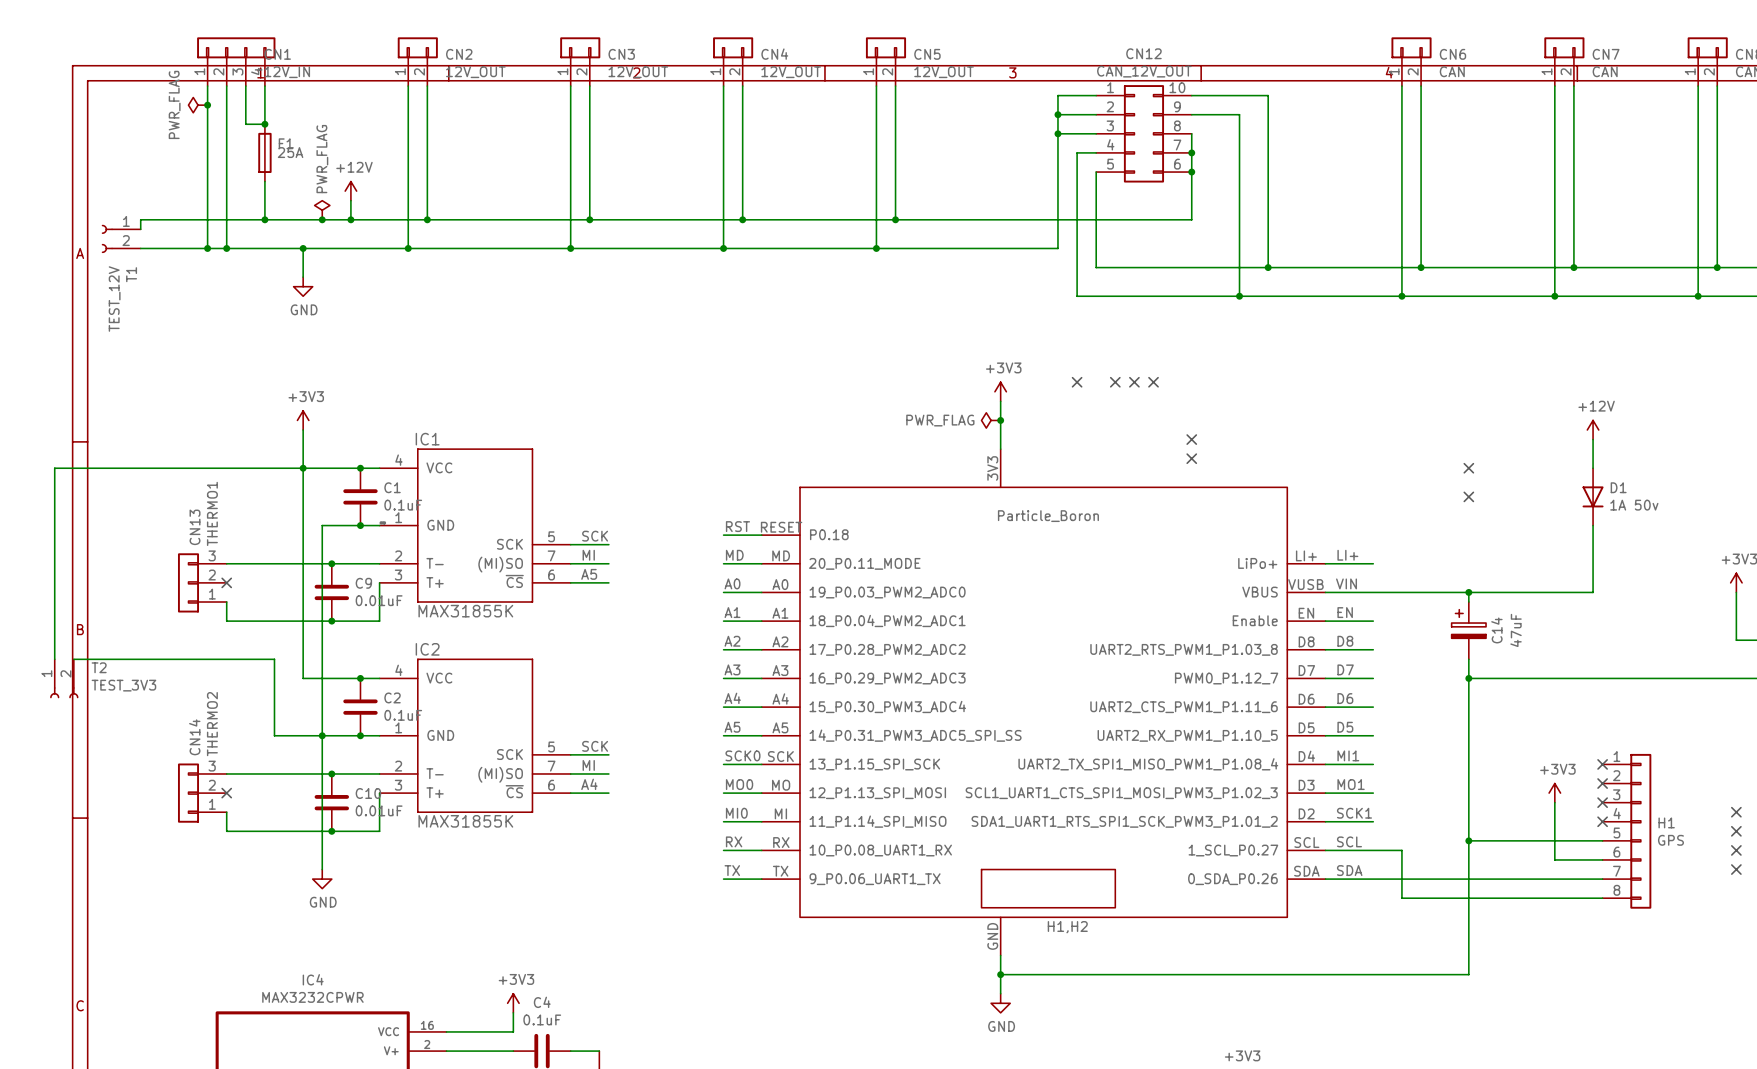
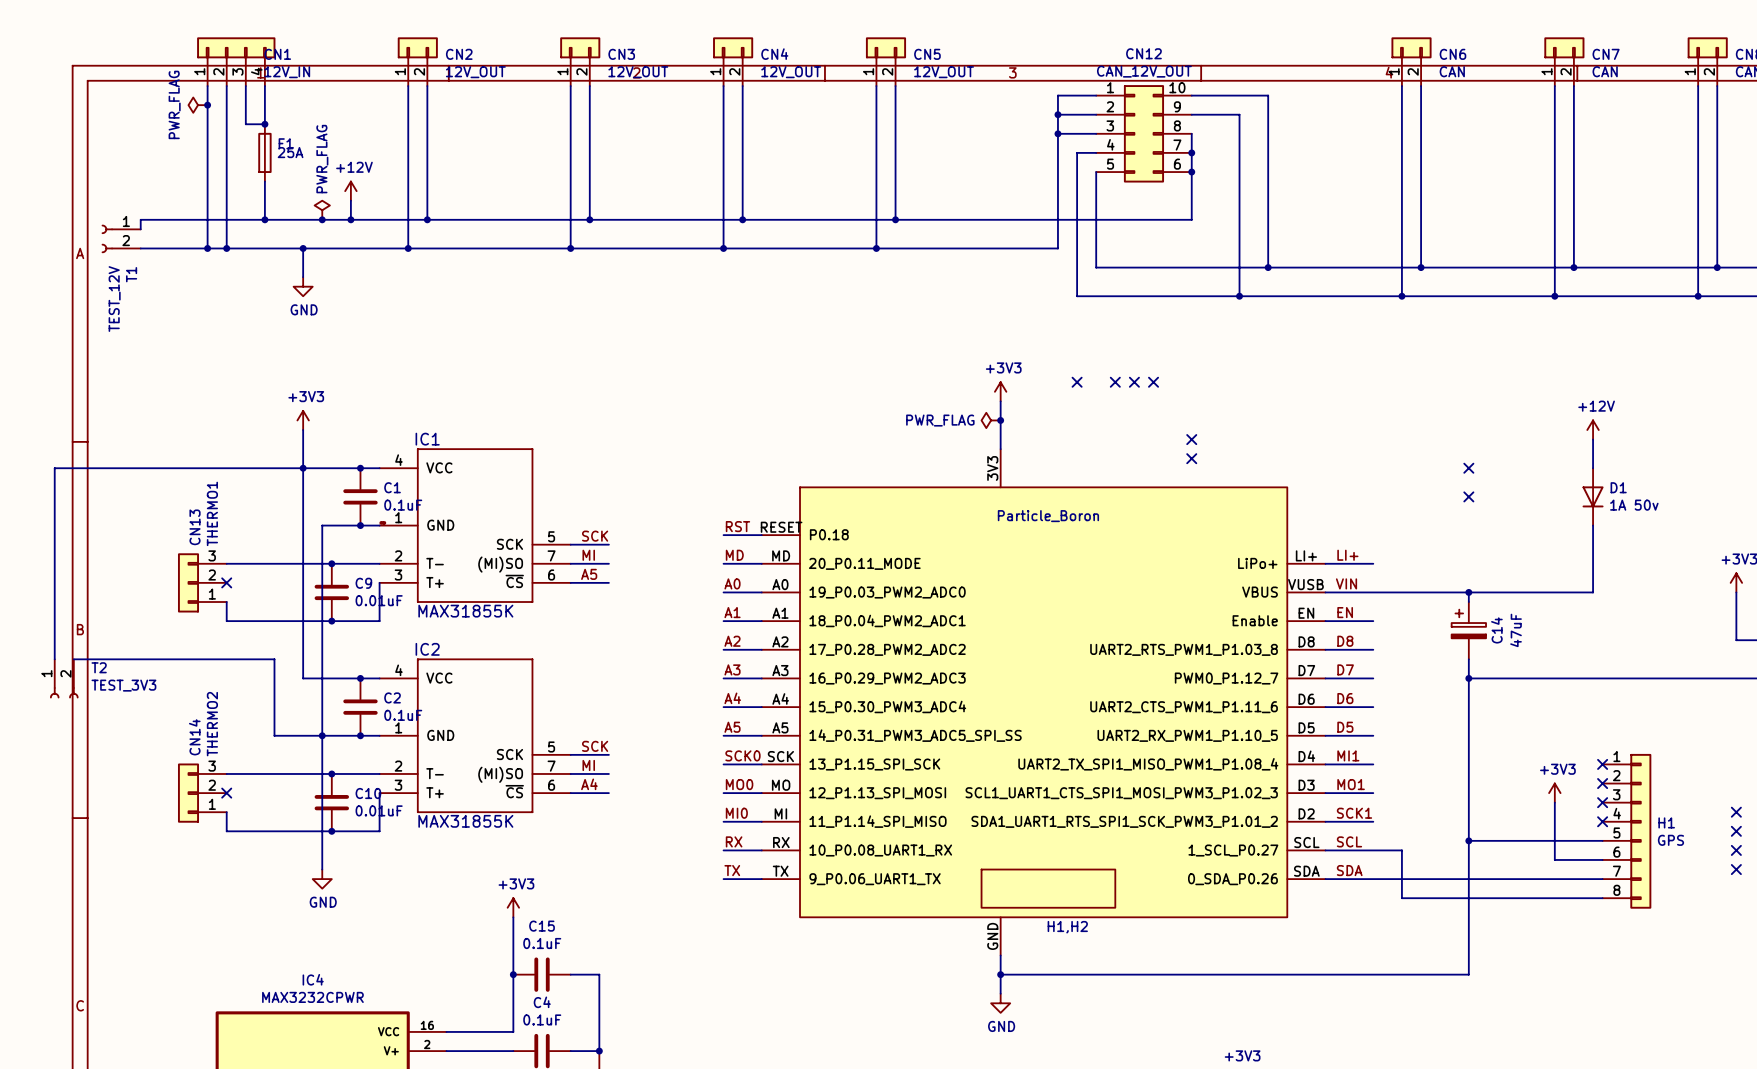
wire: none -> (513, 917) (513, 1012)
junction: none -> (513, 974)
C15: none -> 0.1uF (542, 974)
wire: none -> (570, 974) (599, 974) (599, 1051)
power symbol position: +3V3 (513, 1003) -> +3V3 (513, 907)
junction: none -> (599, 1051)

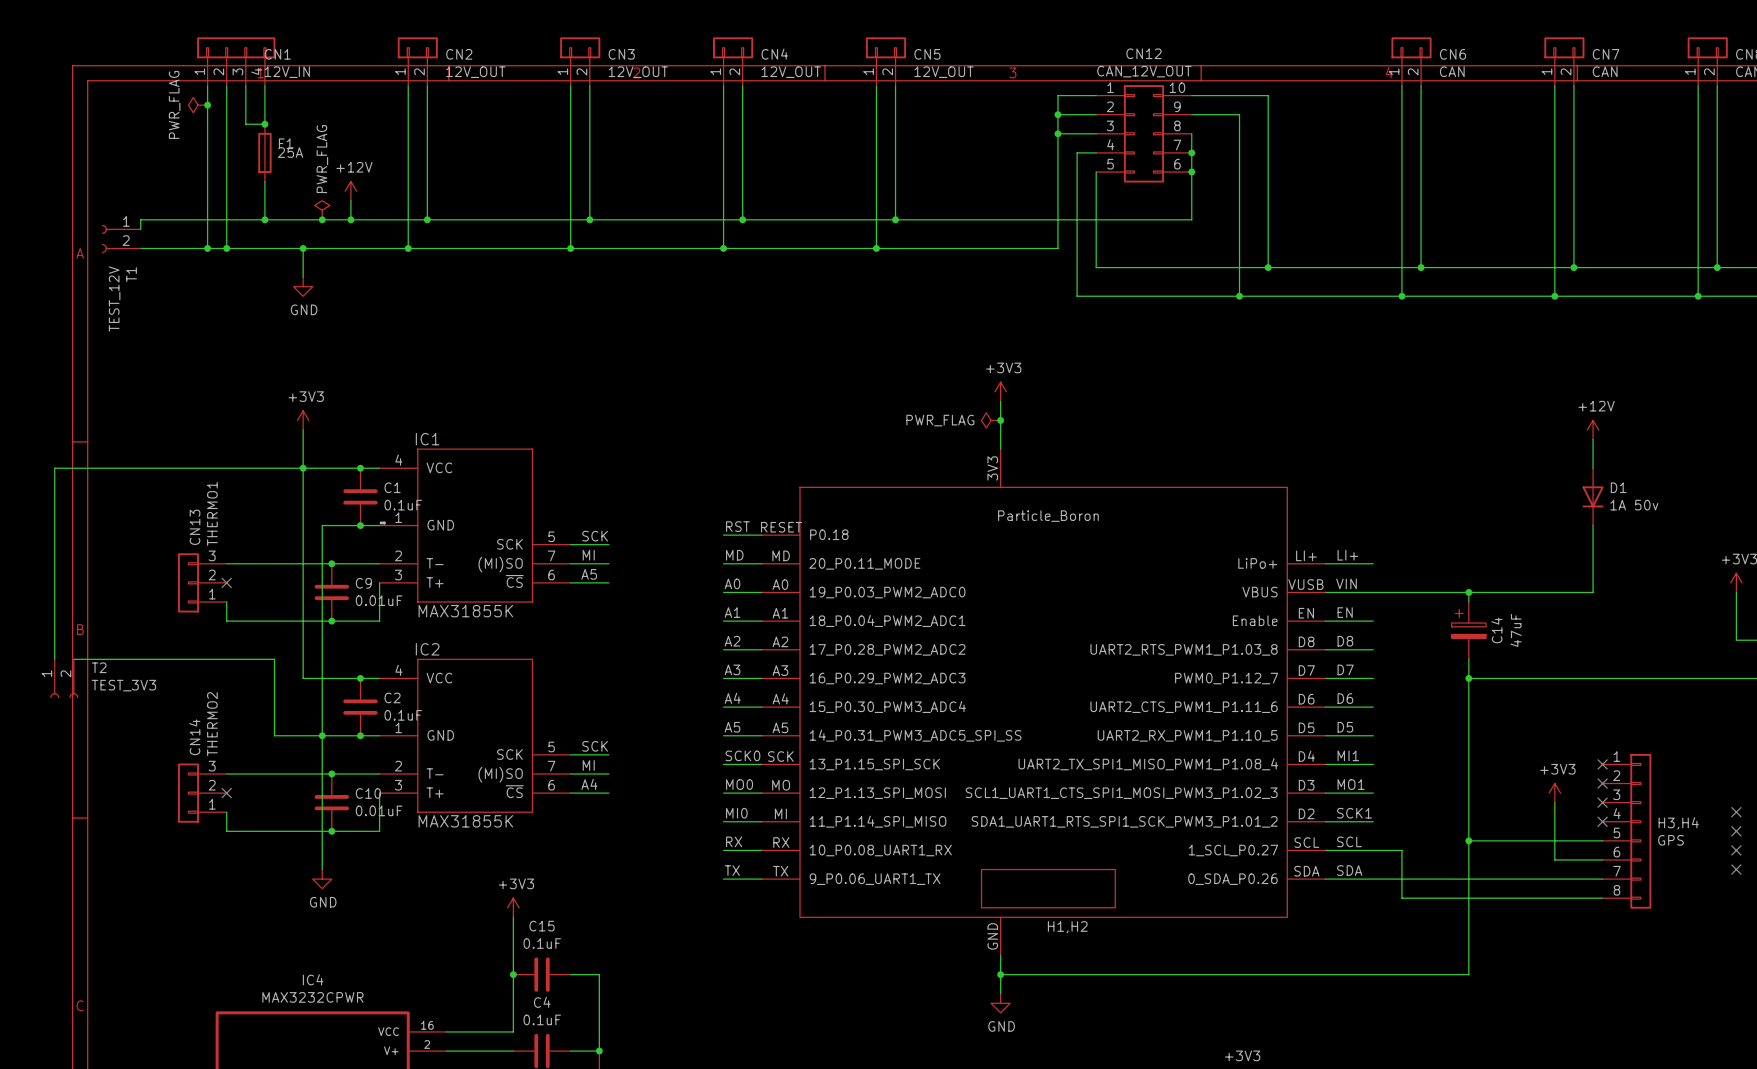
no-connect mark: (1077, 382) -> none
no-connect mark: (1115, 382) -> none
no-connect mark: (1134, 382) -> none
no-connect mark: (1153, 382) -> none
no-connect mark: (1191, 439) -> none
no-connect mark: (1191, 458) -> none
no-connect mark: (1468, 468) -> none
no-connect mark: (1468, 496) -> none
H1 name: H1 (1666, 822) -> H3,H4 (1678, 823)

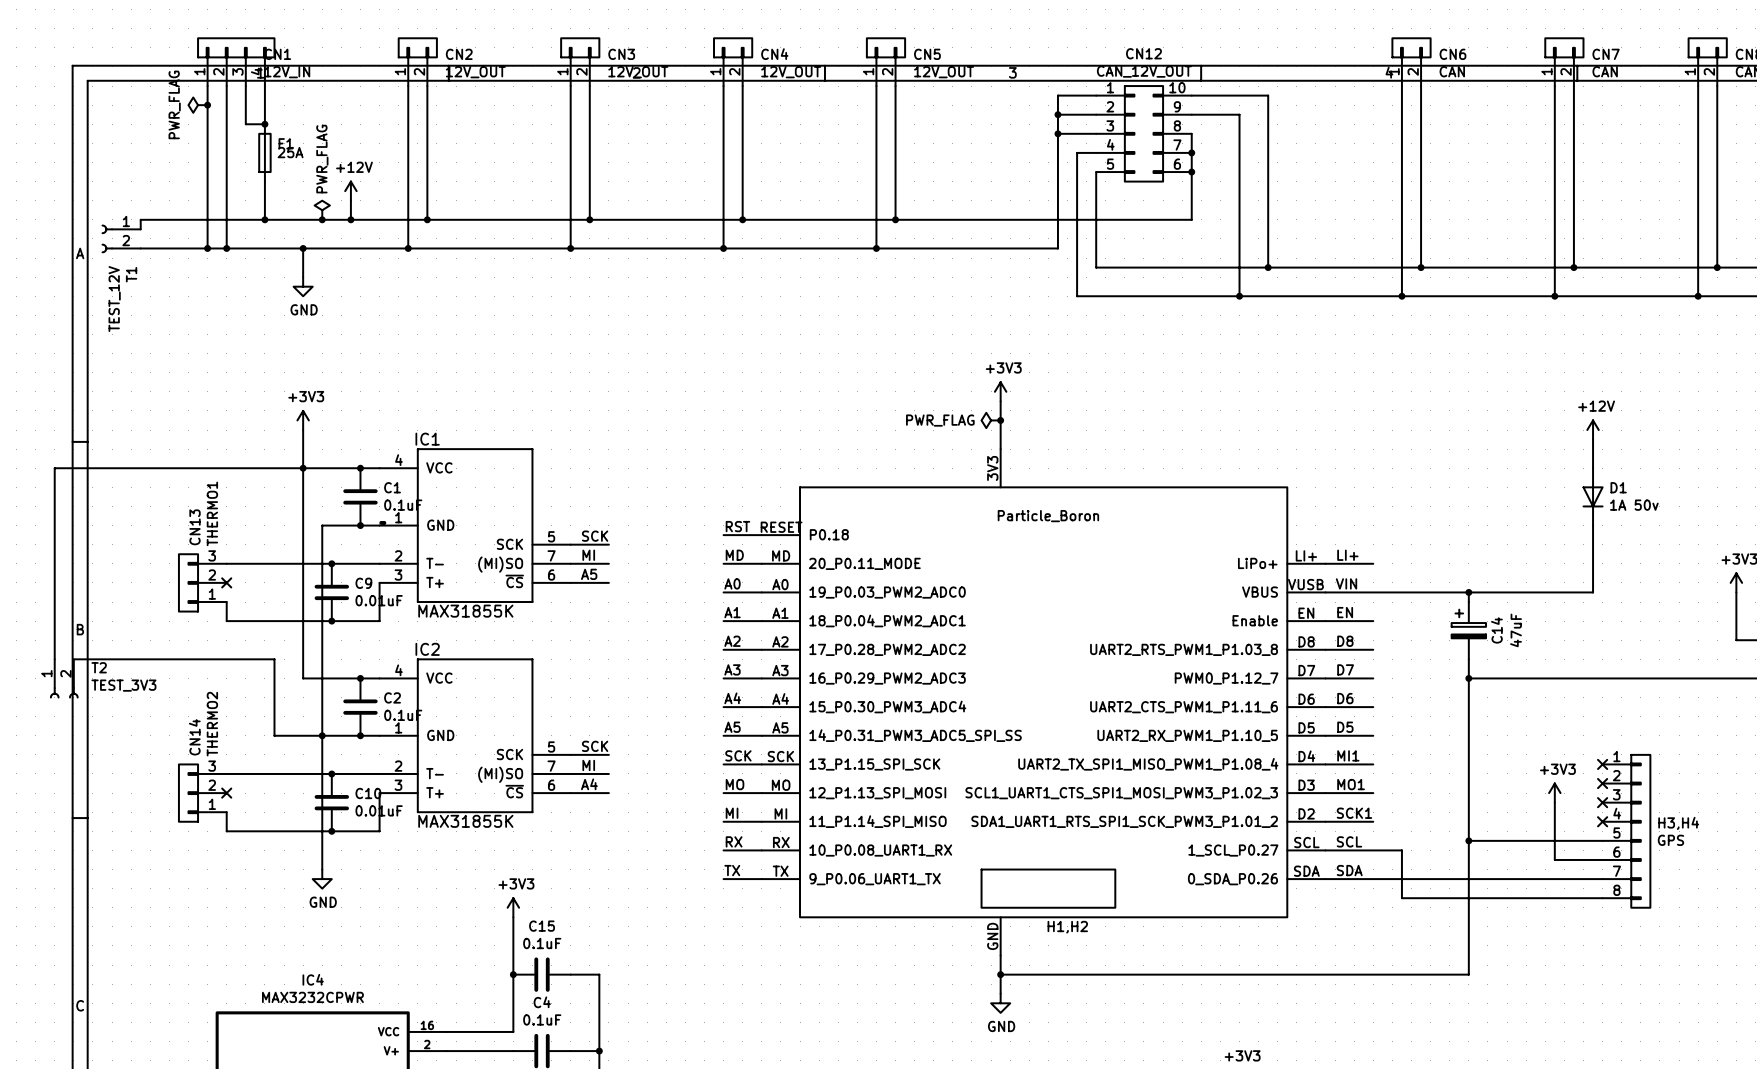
label: SCK0 (742, 755) -> SCK (738, 755)
label: MO0 (739, 784) -> MO (735, 784)
no-connect mark: (1736, 812) -> none
label: MI0 (736, 813) -> MI (732, 813)
no-connect mark: (1736, 831) -> none
no-connect mark: (1736, 850) -> none
no-connect mark: (1736, 869) -> none

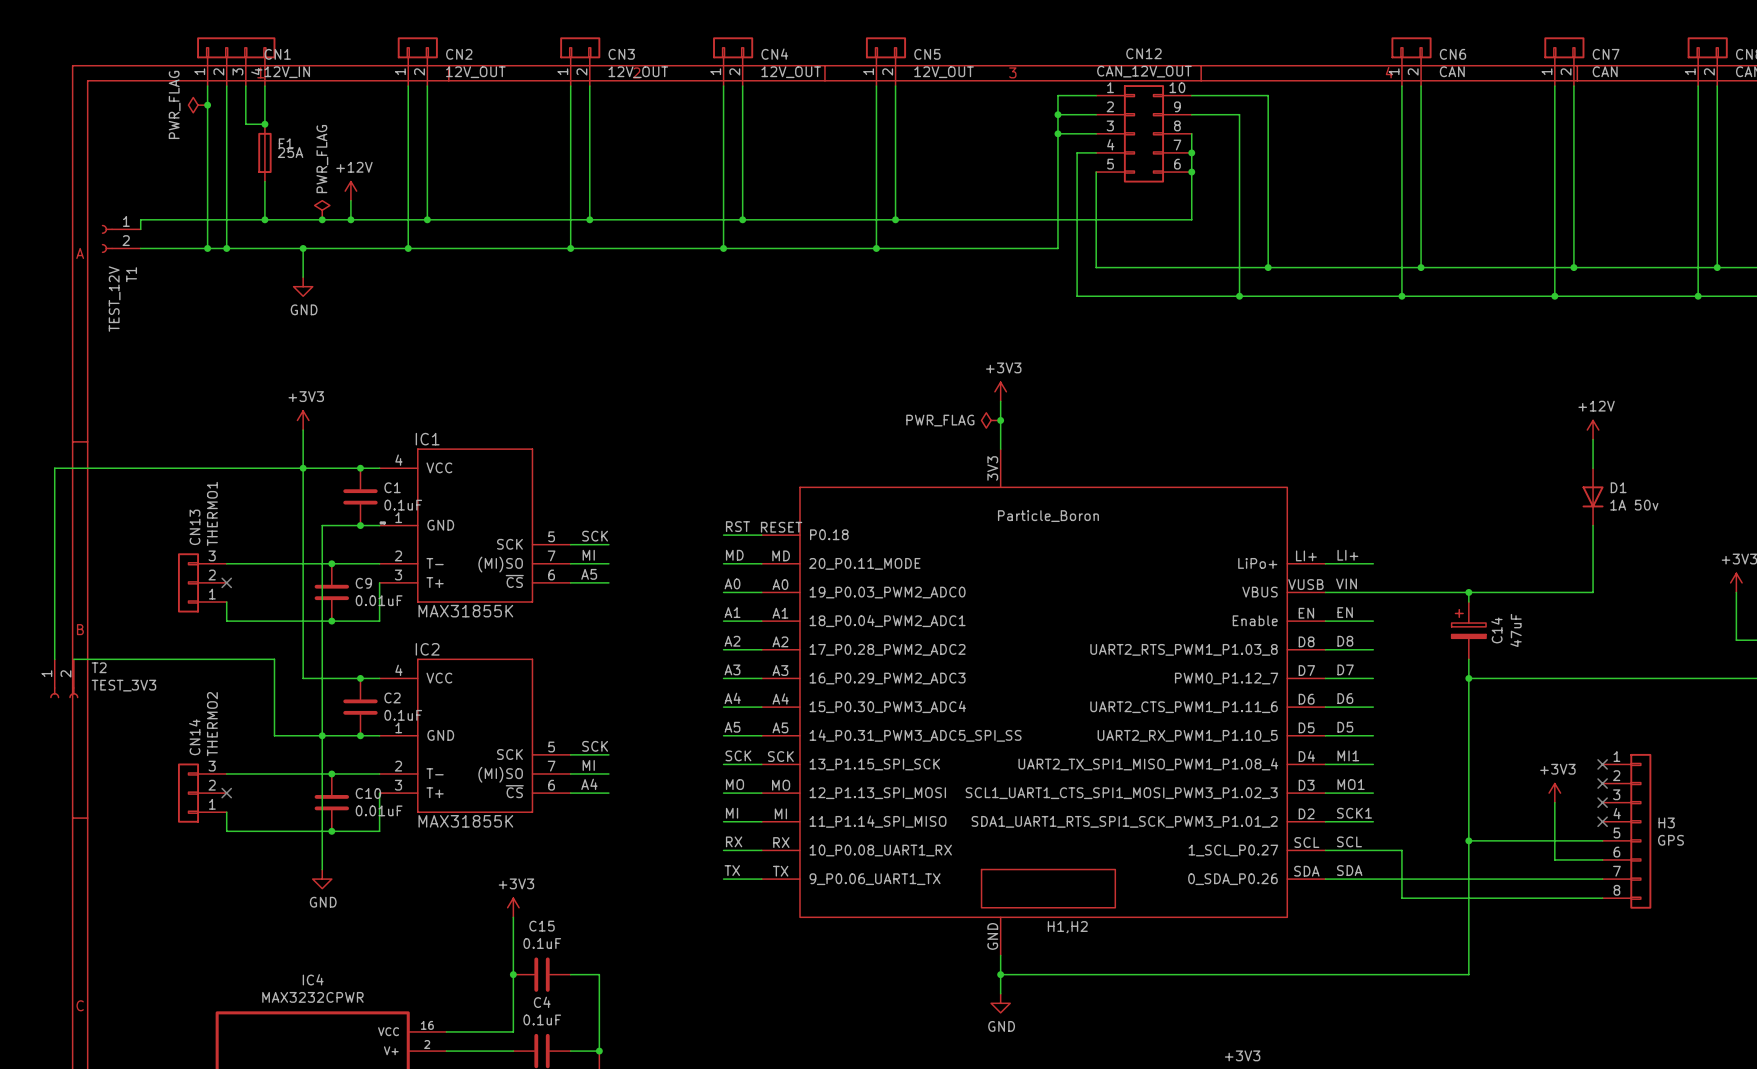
H3,H4 name: H3,H4 (1678, 823) -> H3 (1666, 822)

